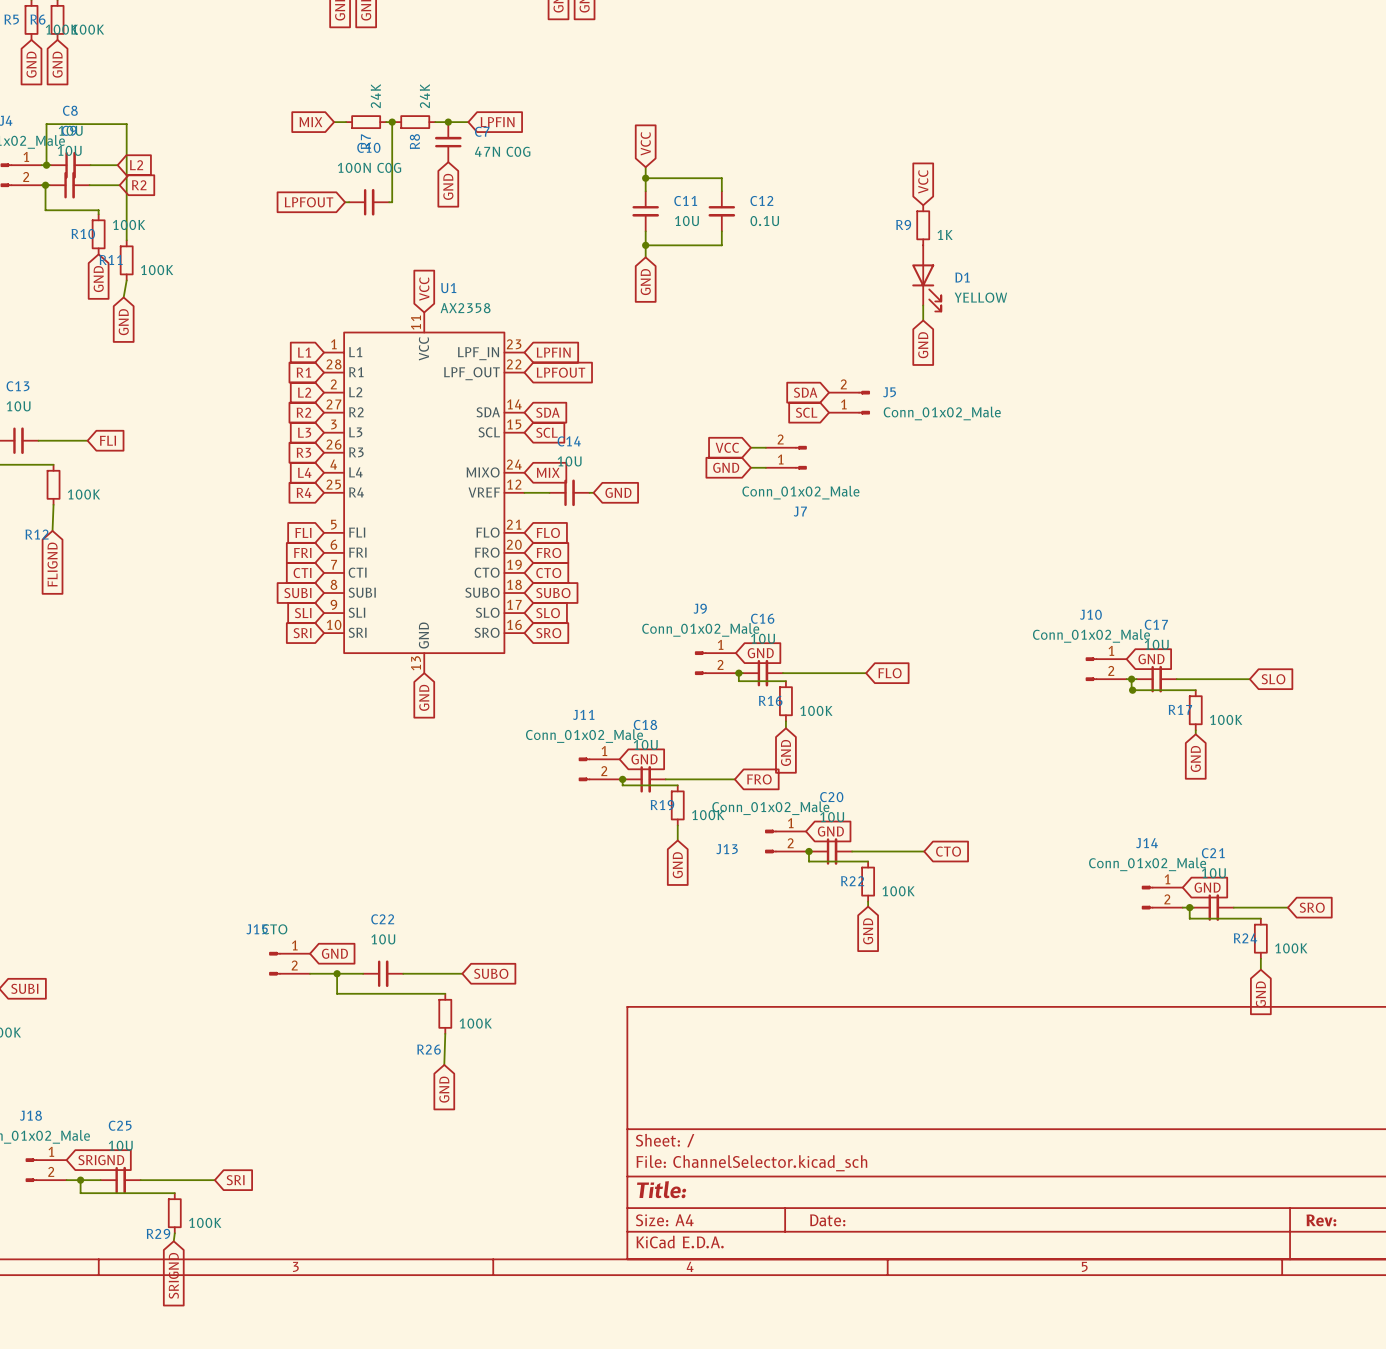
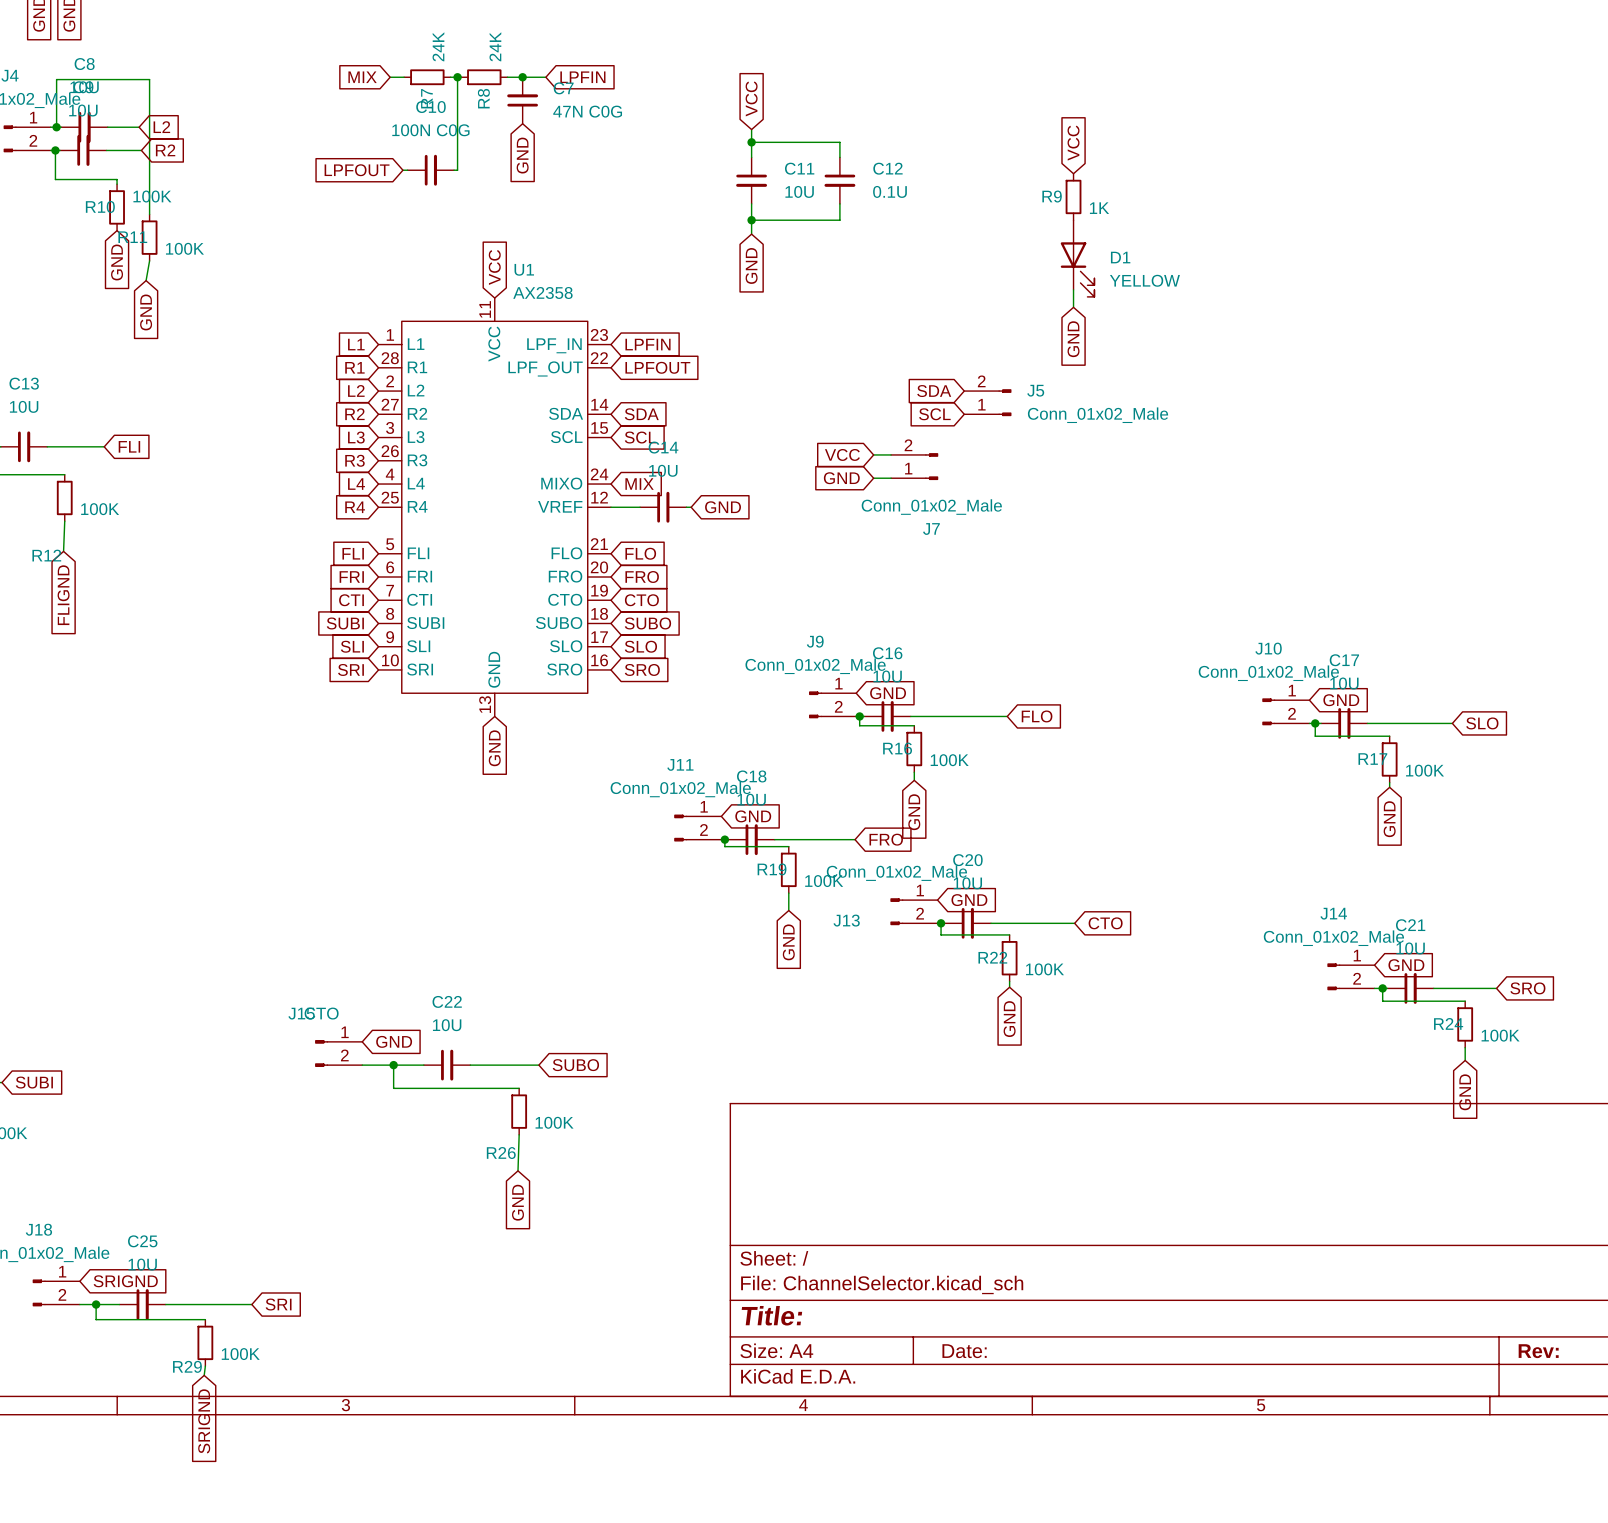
junction: (1132, 690) -> none

